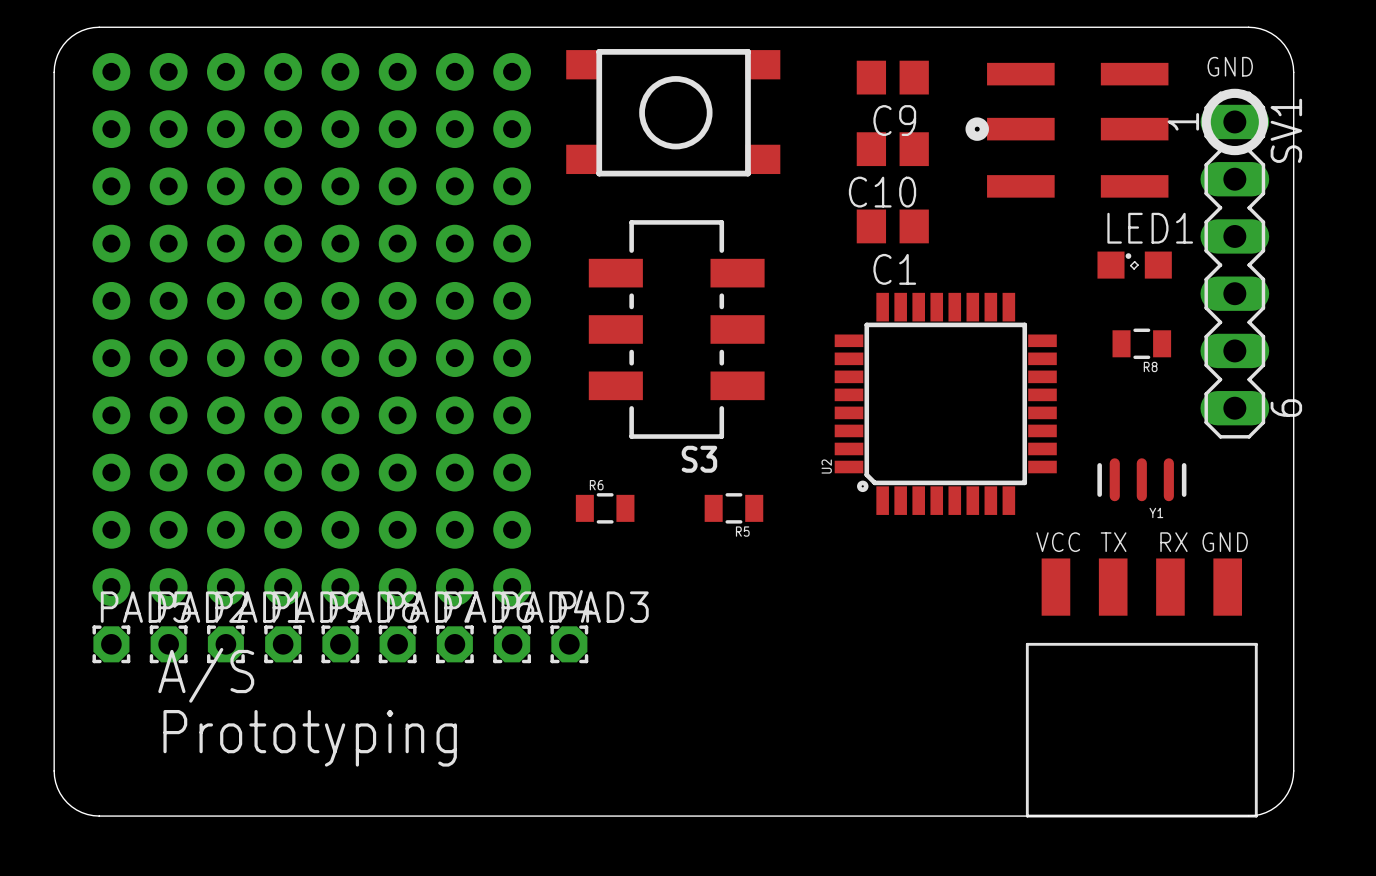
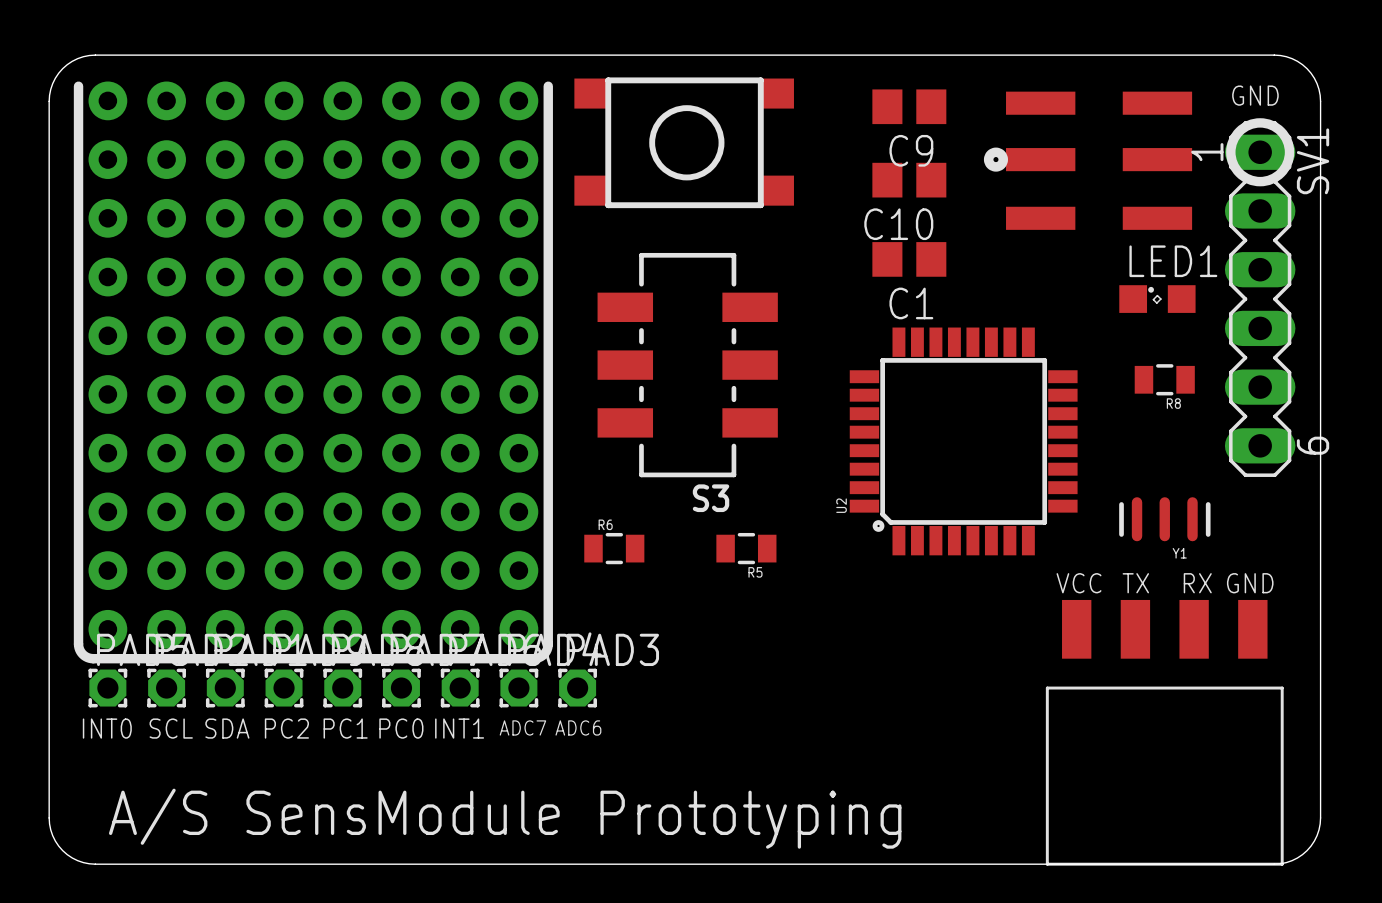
line: none -> (78, 86) (78, 644) (82, 654) (93, 658) (533, 658) (545, 652) (548, 644) (548, 86)
text: A/S (206, 675) -> SCL (171, 728)
text: none -> INT0 (107, 728)
text: none -> SDA (227, 728)
text: none -> PC2 (286, 728)
text: none -> PC1 (345, 728)
text: none -> PC0 (401, 728)
text: none -> INT1 (459, 728)
text: none -> ADC7 (522, 727)
text: none -> ADC6 (578, 727)
text: Prototyping (310, 738) -> none
text: none -> A/S SensModule Prototyping (505, 818)

